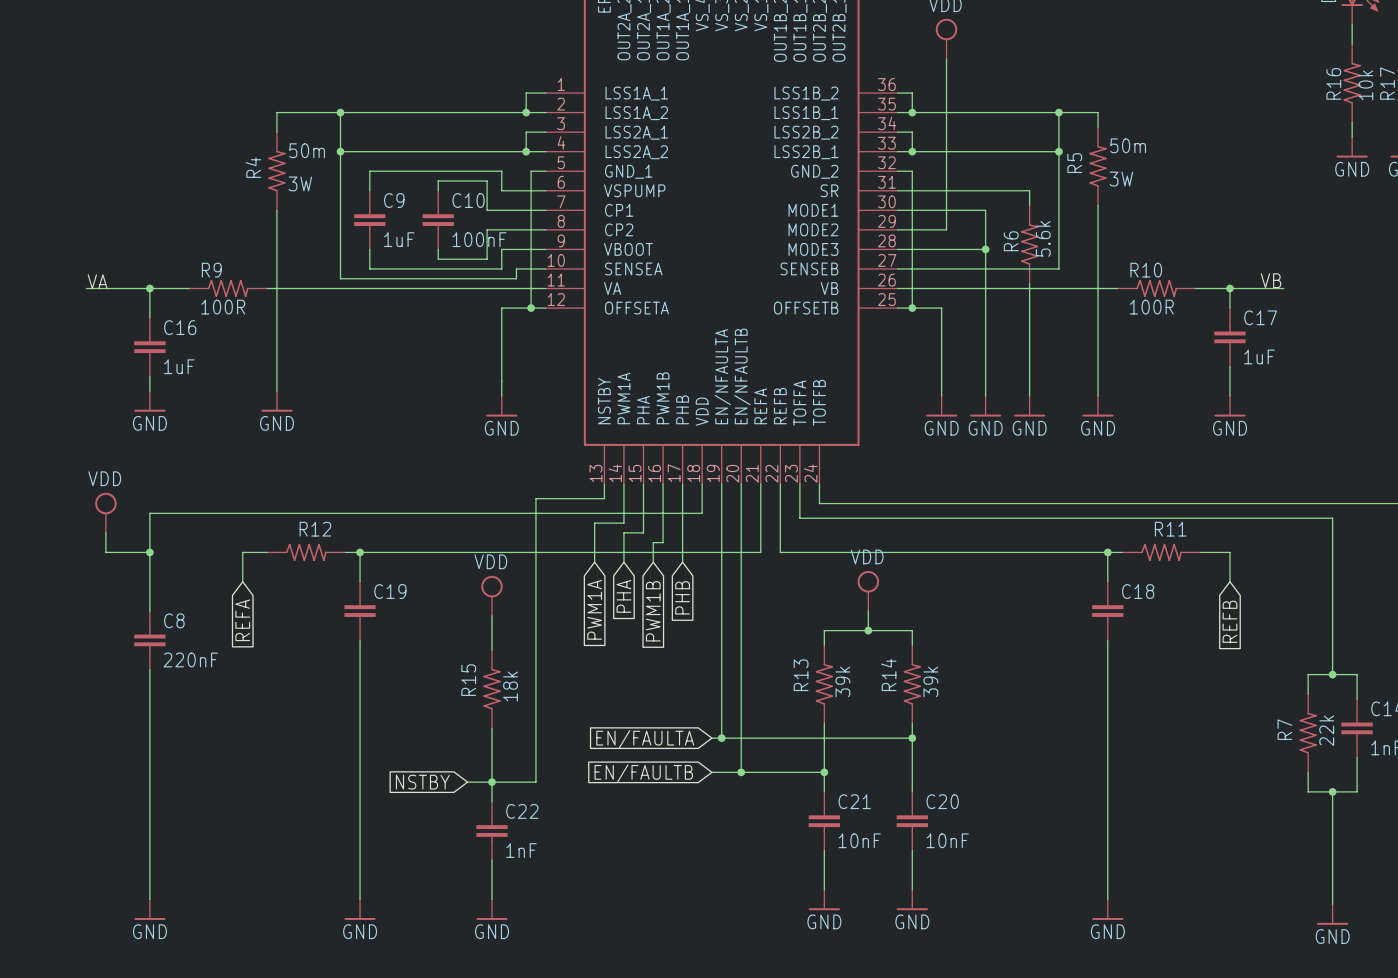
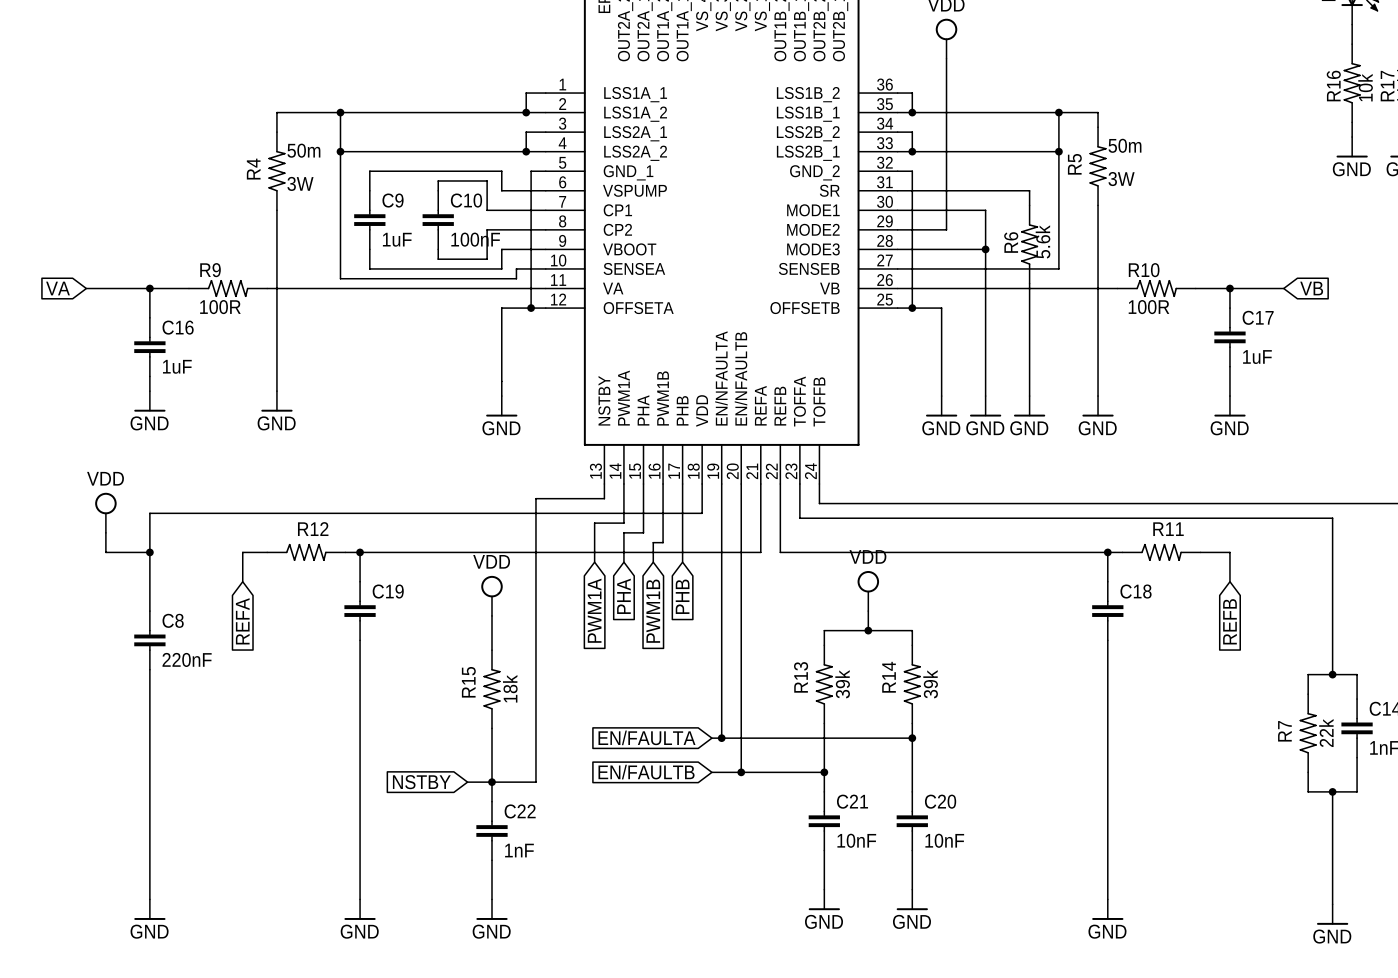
label: VB (1270, 280) -> none
label: VA (97, 281) -> none
global label: none -> VA (58, 288)
global label: none -> VB (1311, 288)

